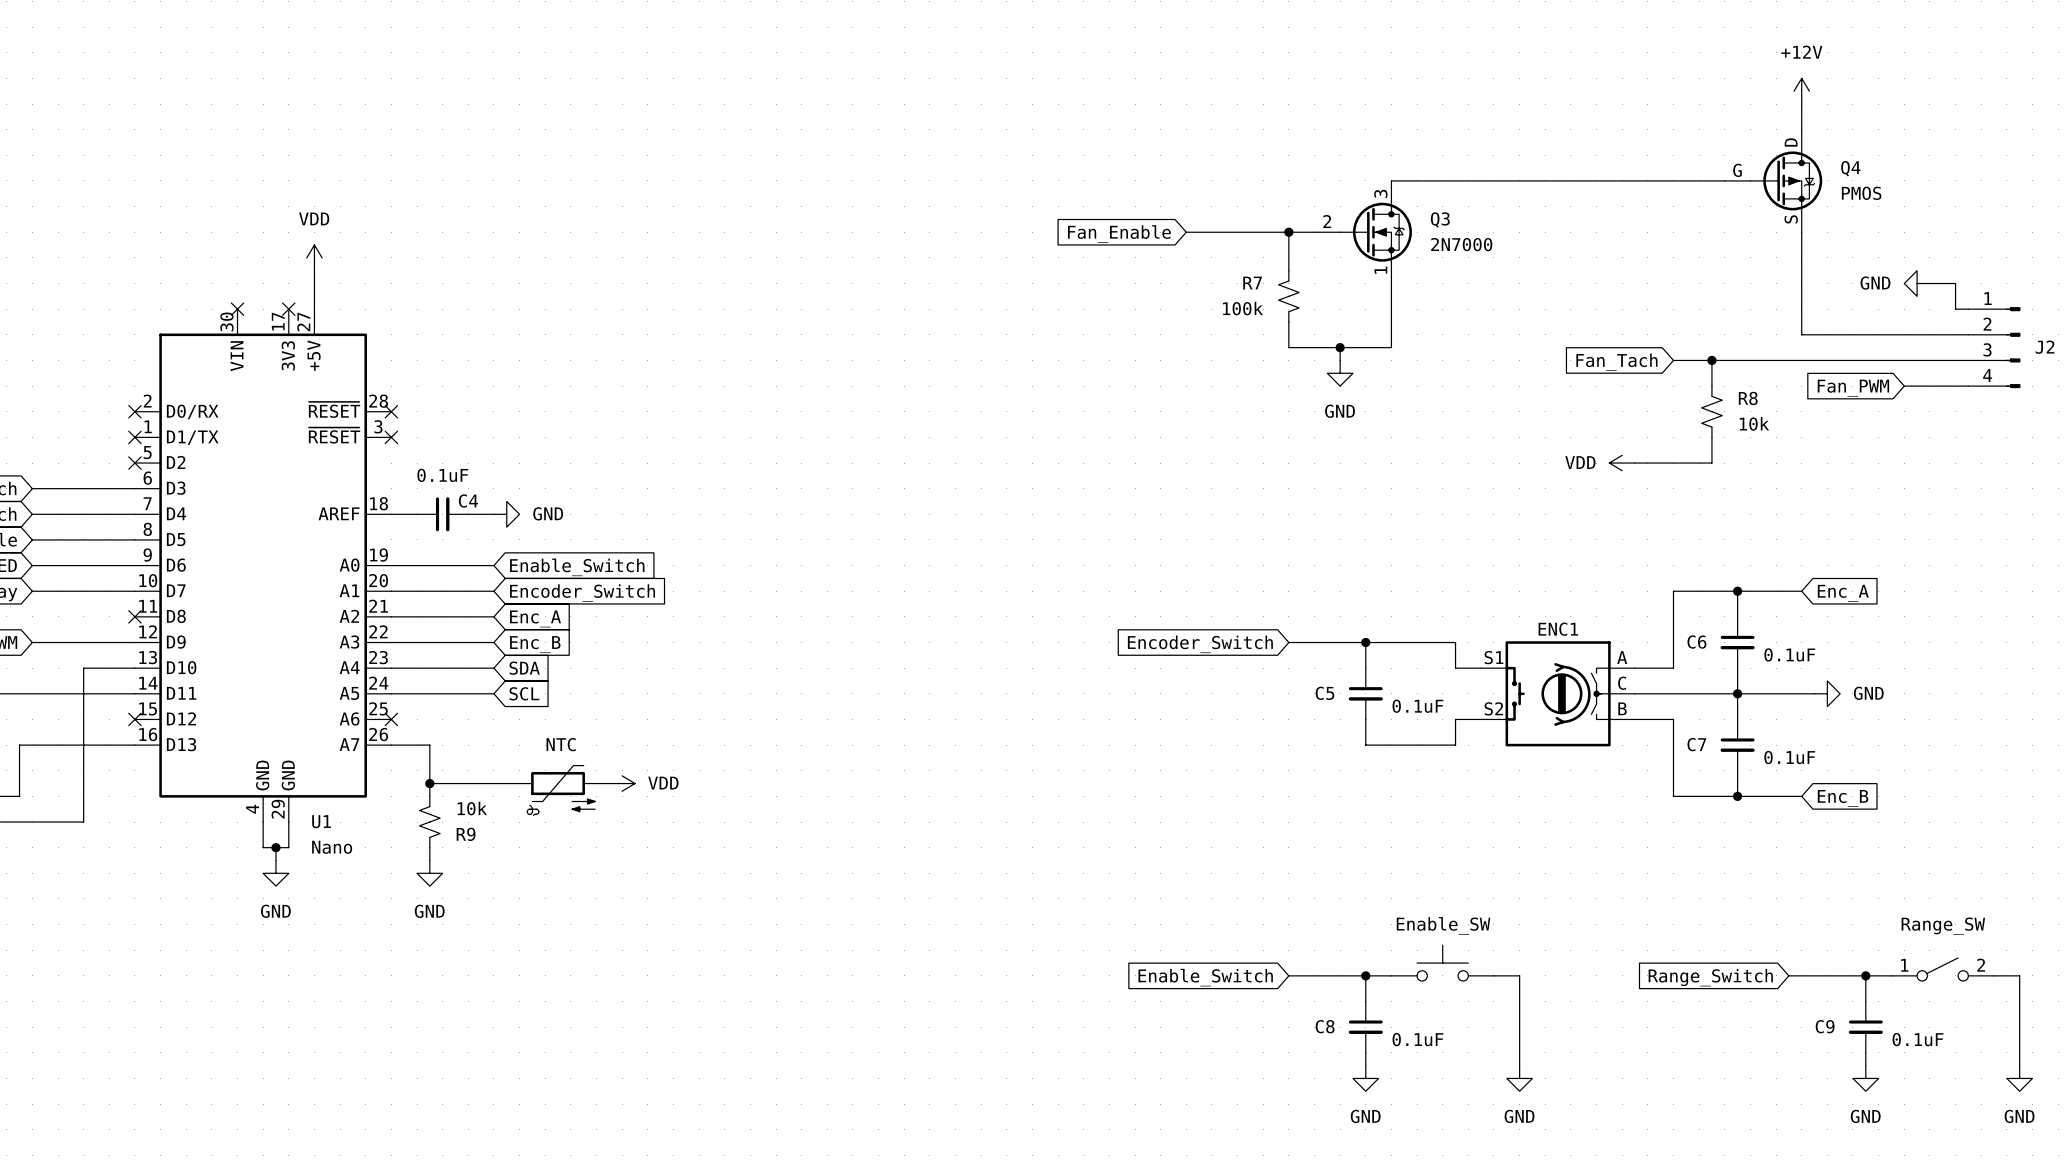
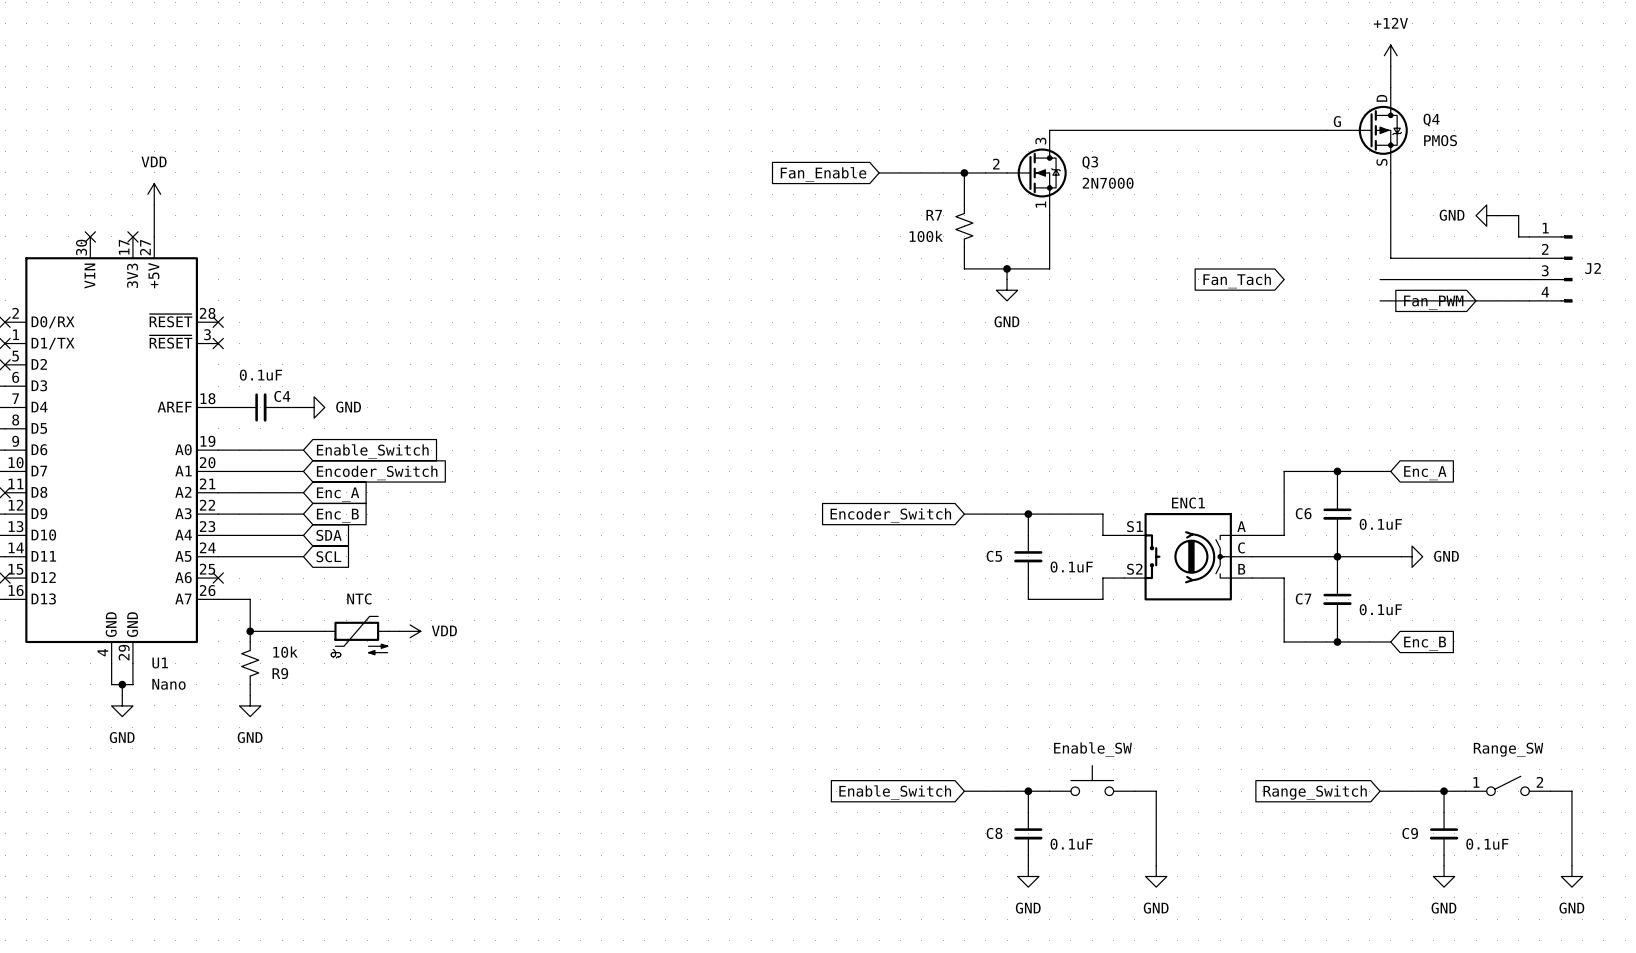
wire: (1673, 360) (1788, 360) -> (1380, 300) (1476, 300)
wire: (1711, 360) (1711, 386) -> none
junction: (1711, 360) -> none
R8: 10k (1711, 411) -> none
wire: (1711, 437) (1711, 463) (1635, 463) -> none
power symbol: VDD (1622, 463) -> none

